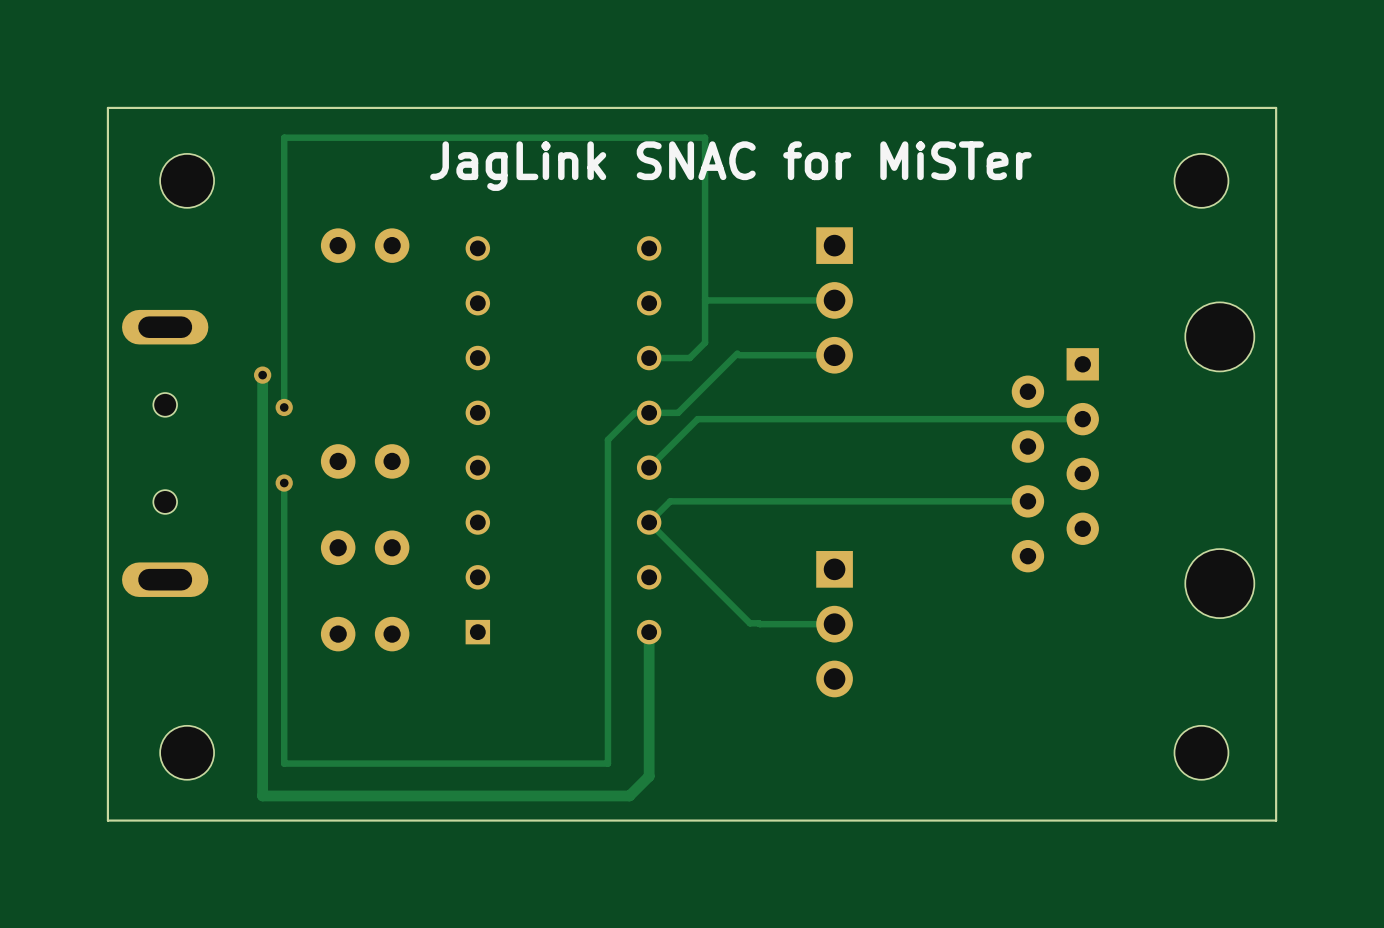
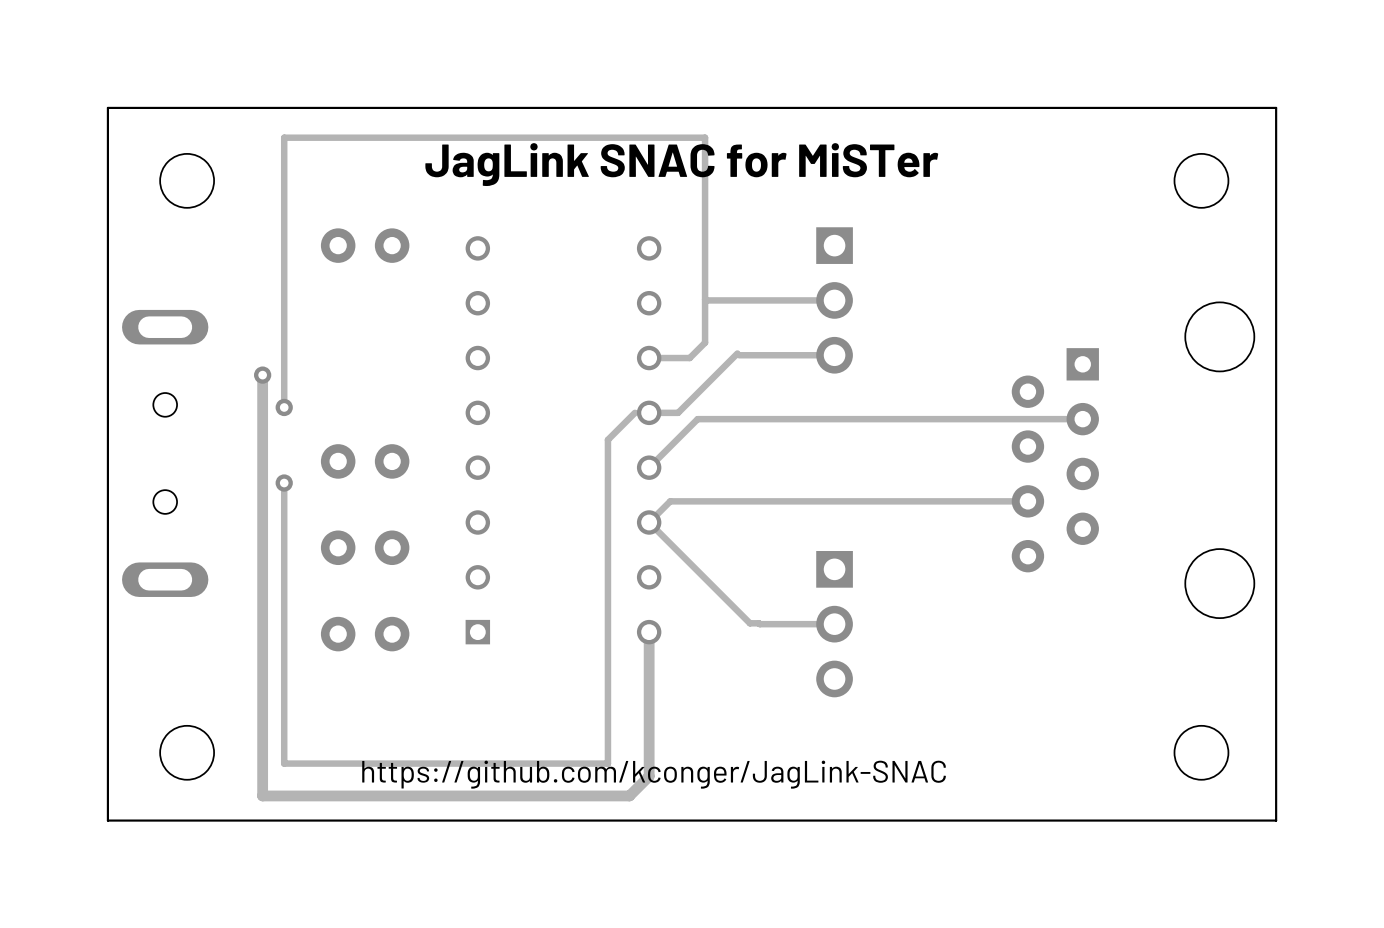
text: none -> https://github.com/kconger/JagLink-SNAC (654, 774)

